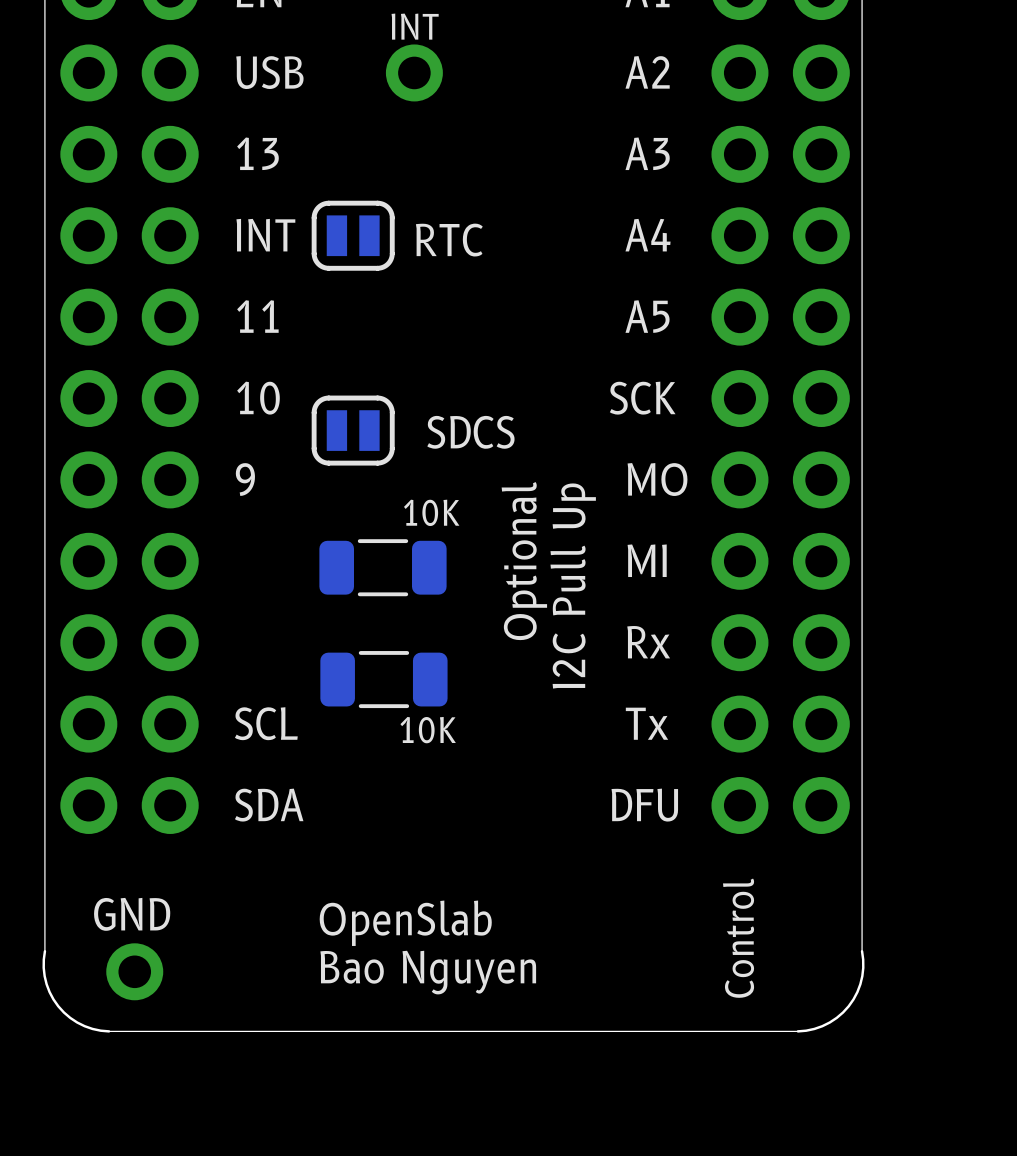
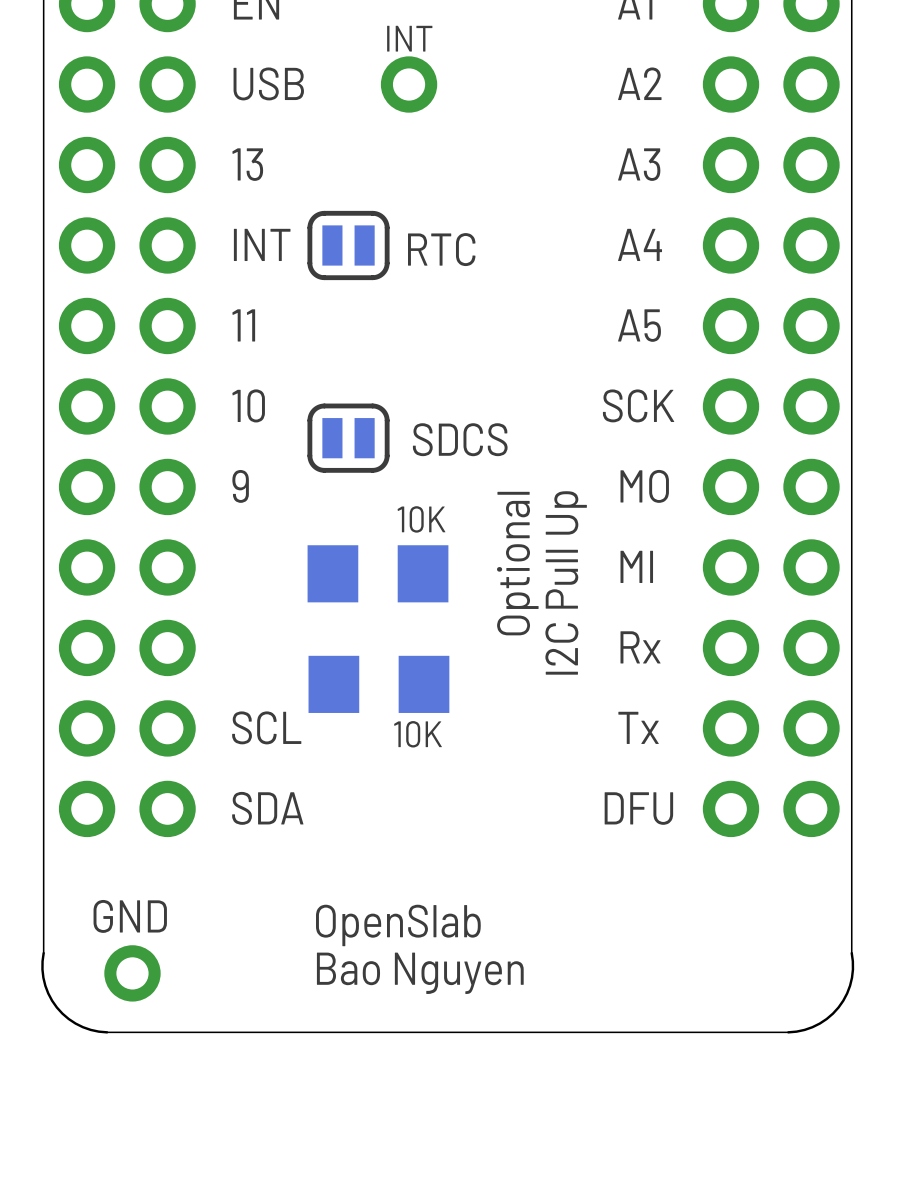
part footprint: [319, 539, 447, 597] -> [307, 545, 449, 603]
part footprint: [320, 651, 448, 709] -> [308, 655, 450, 713]
text: Control (738, 938) -> none

